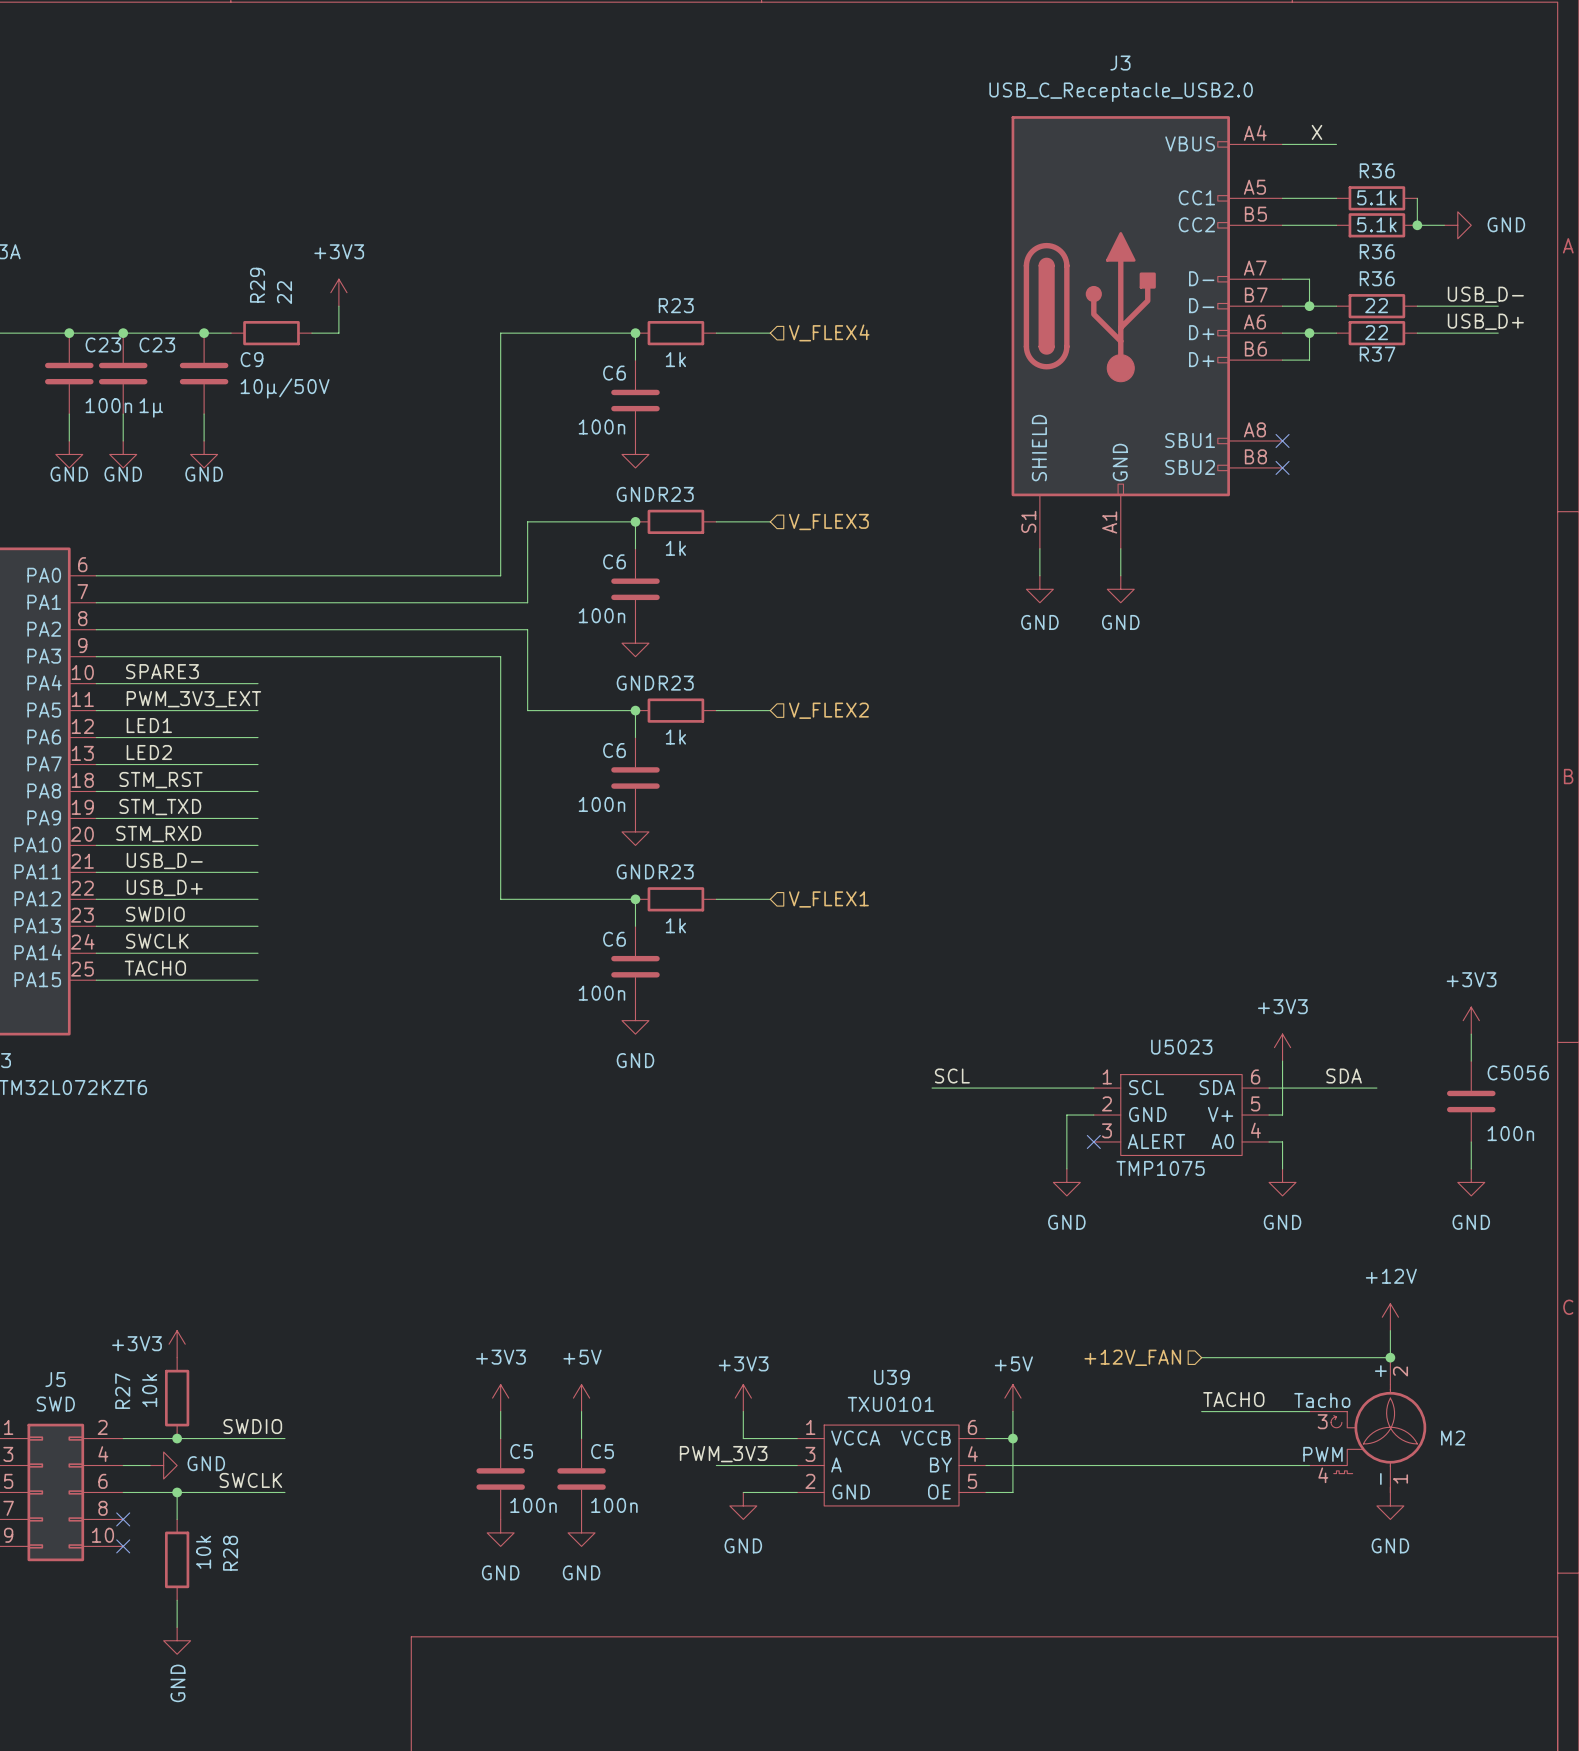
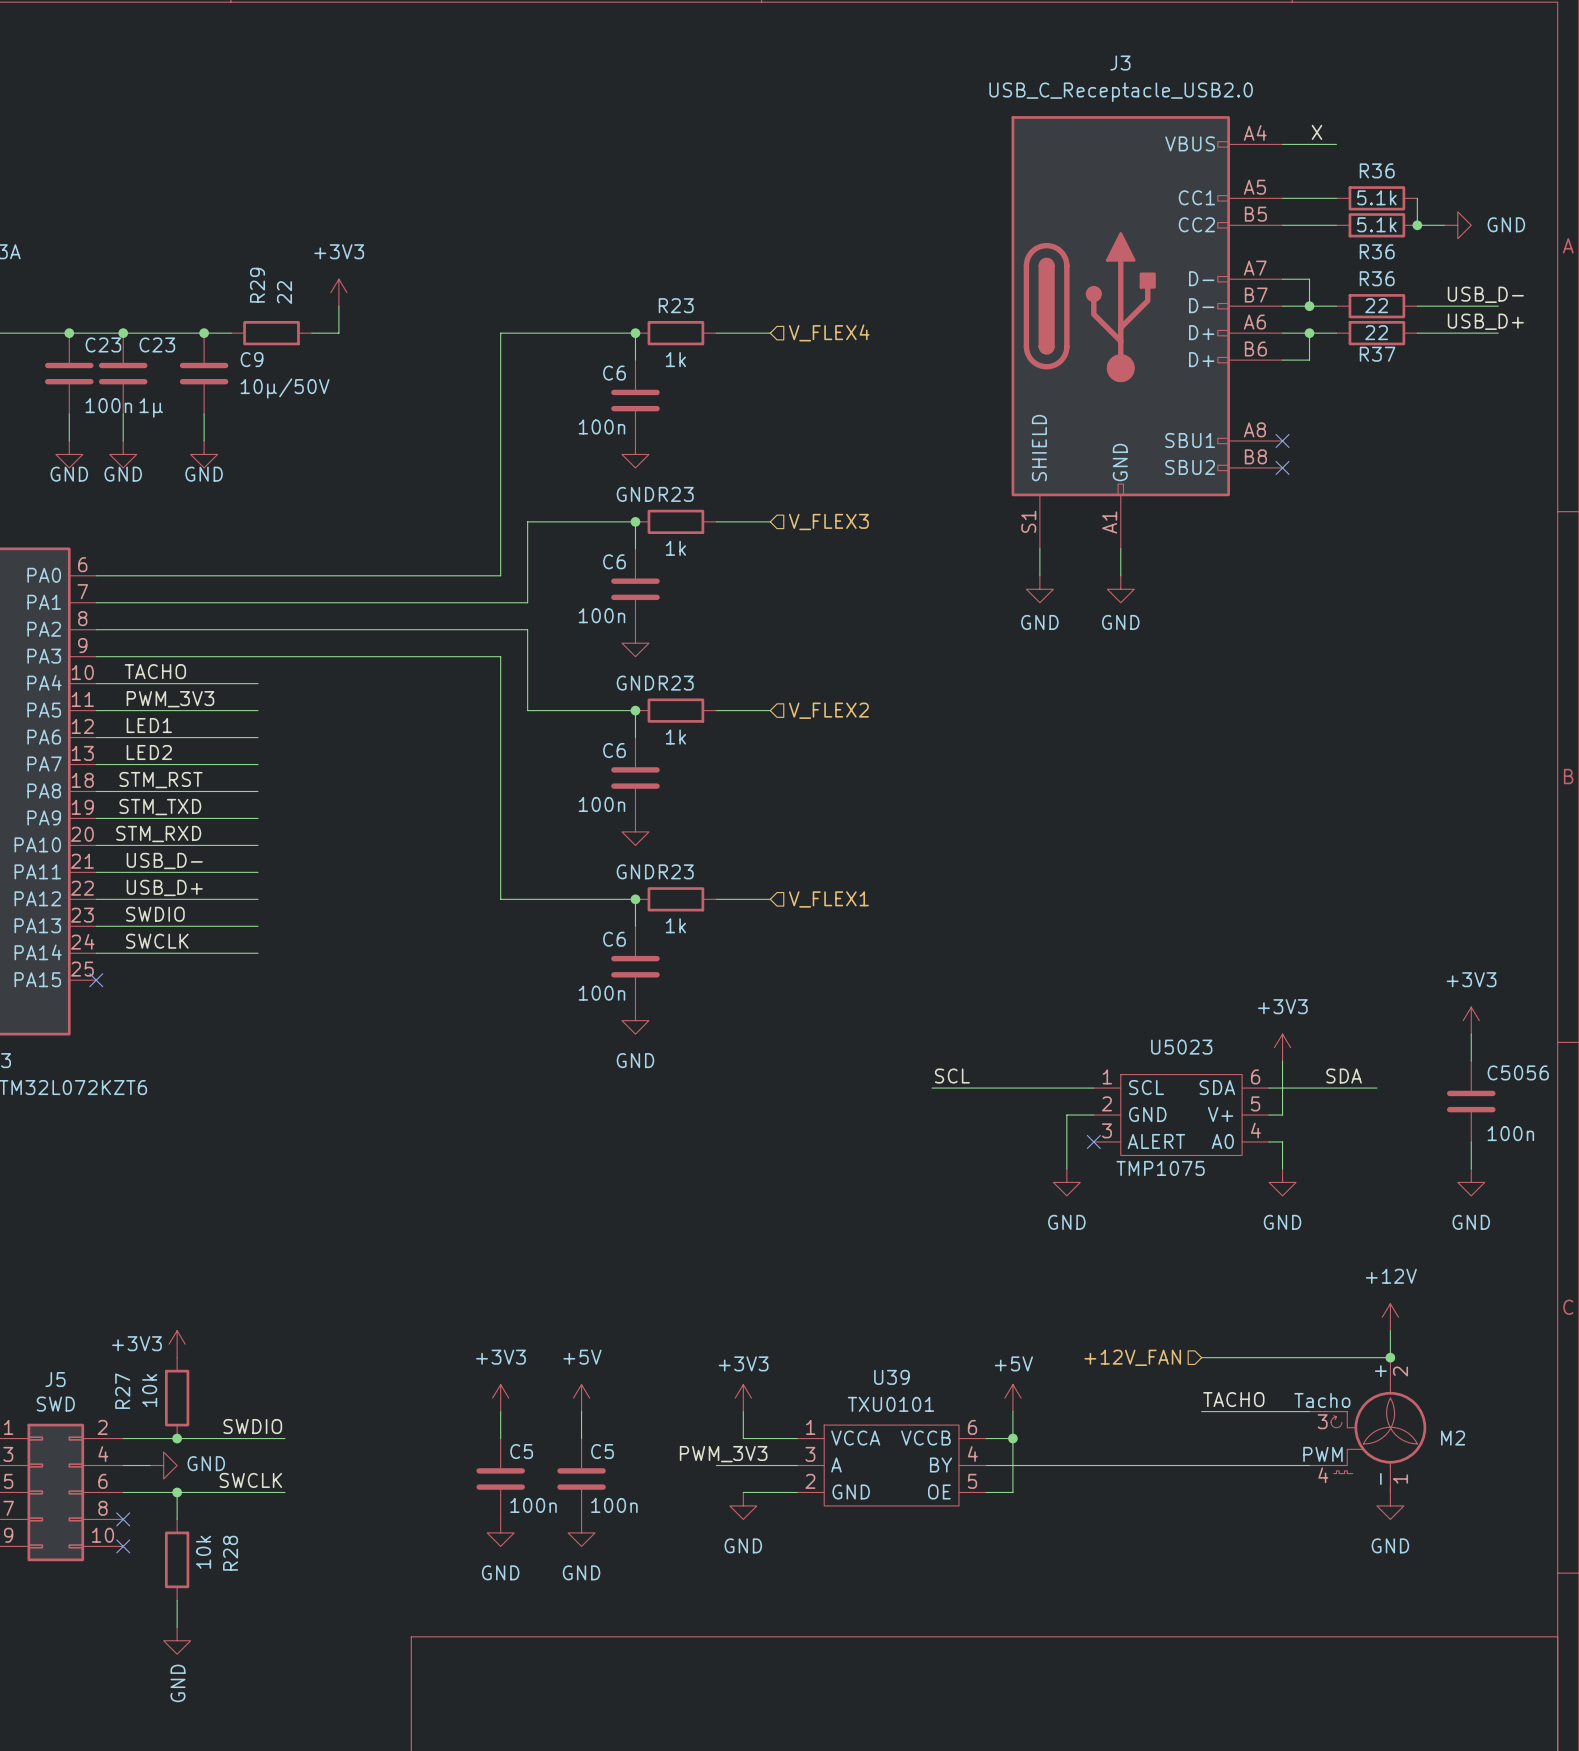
label: SPARE3 (162, 671) -> TACHO (155, 671)
label: PWM_3V3_EXT (193, 699) -> PWM_3V3 (170, 699)
label: TACHO (155, 968) -> none
wire: (96, 980) (258, 980) -> none
no-connect mark: none -> (96, 980)

